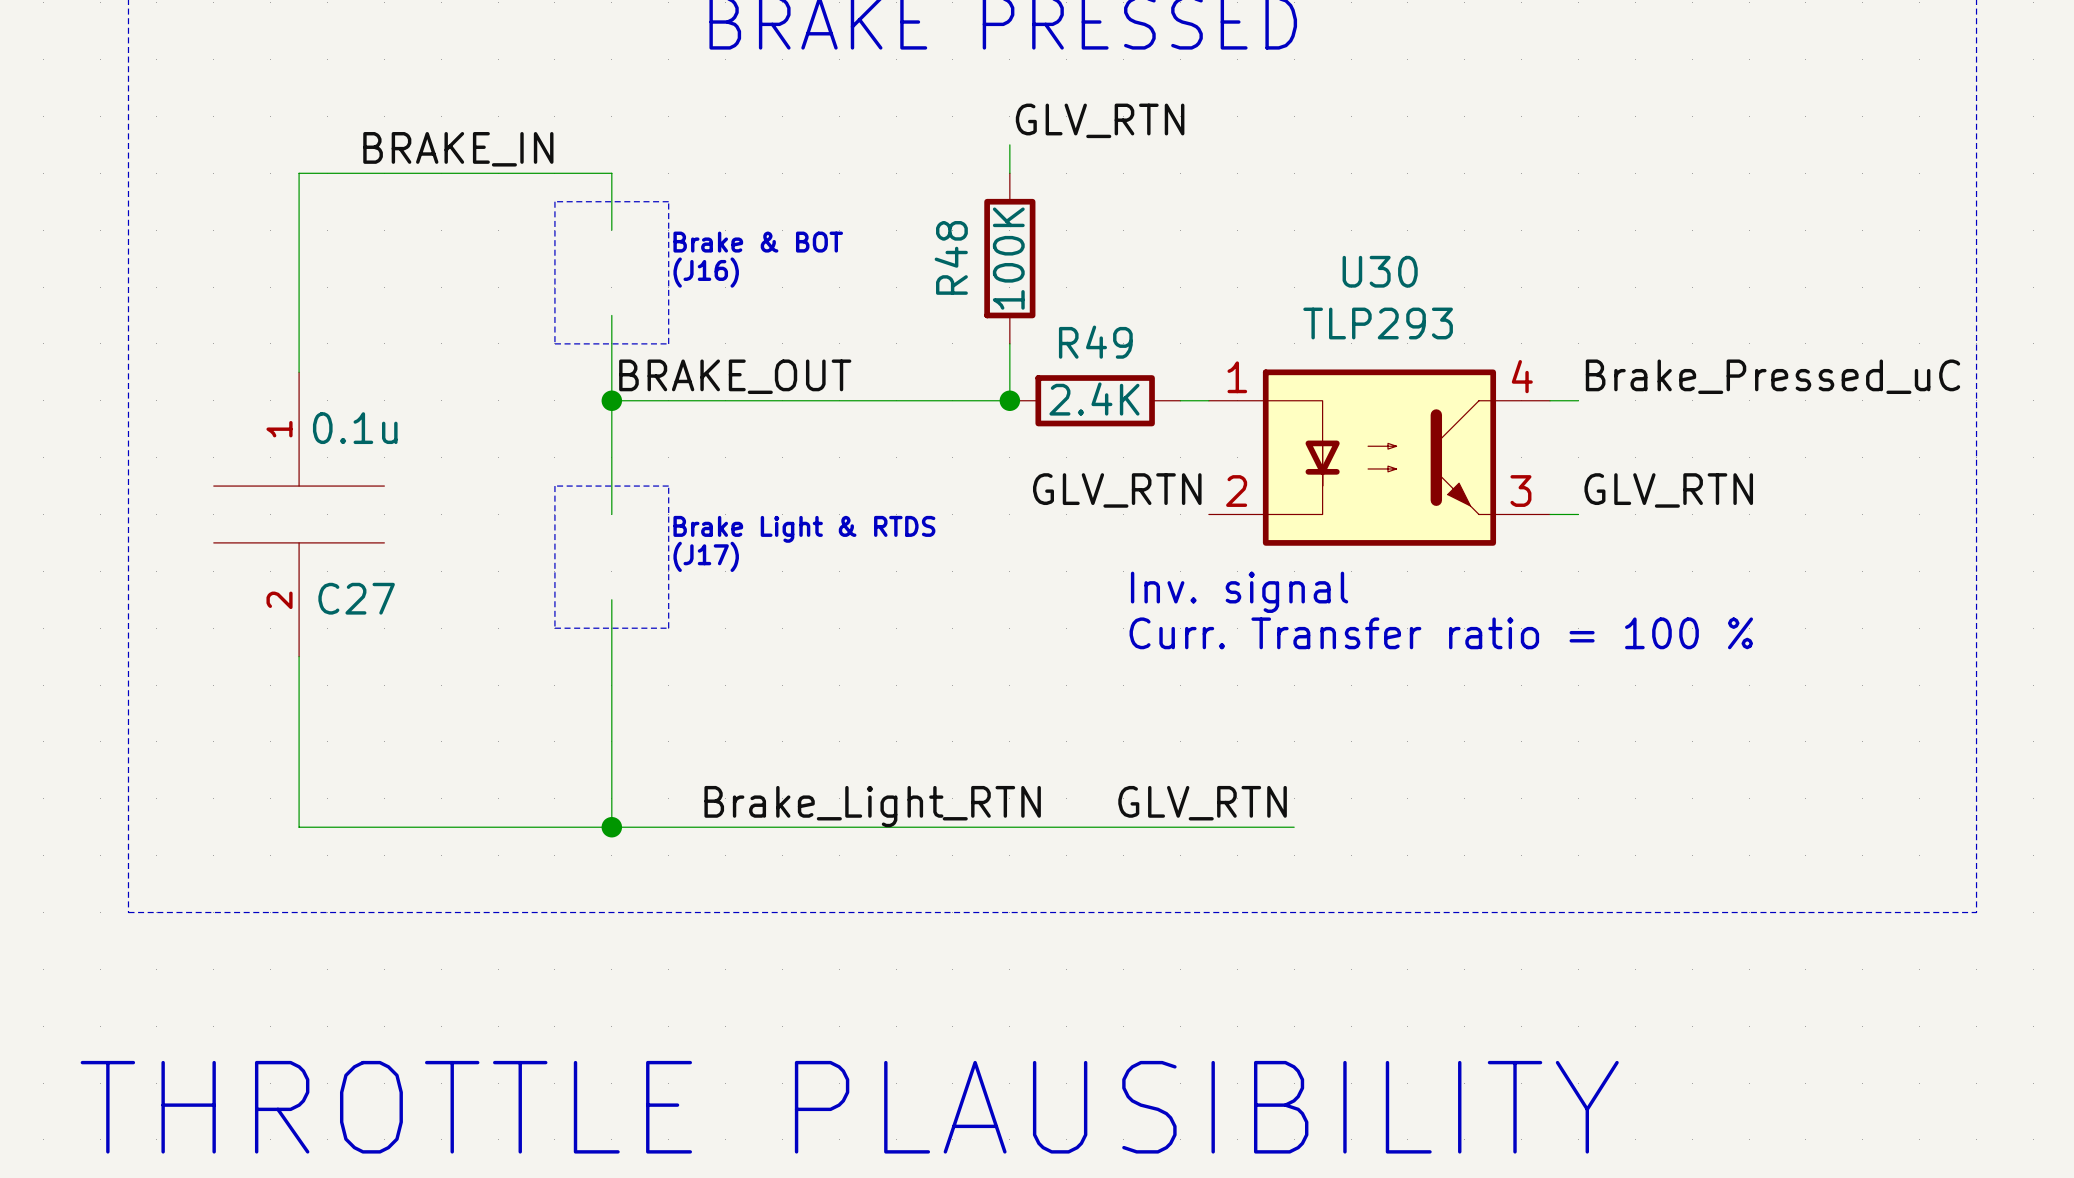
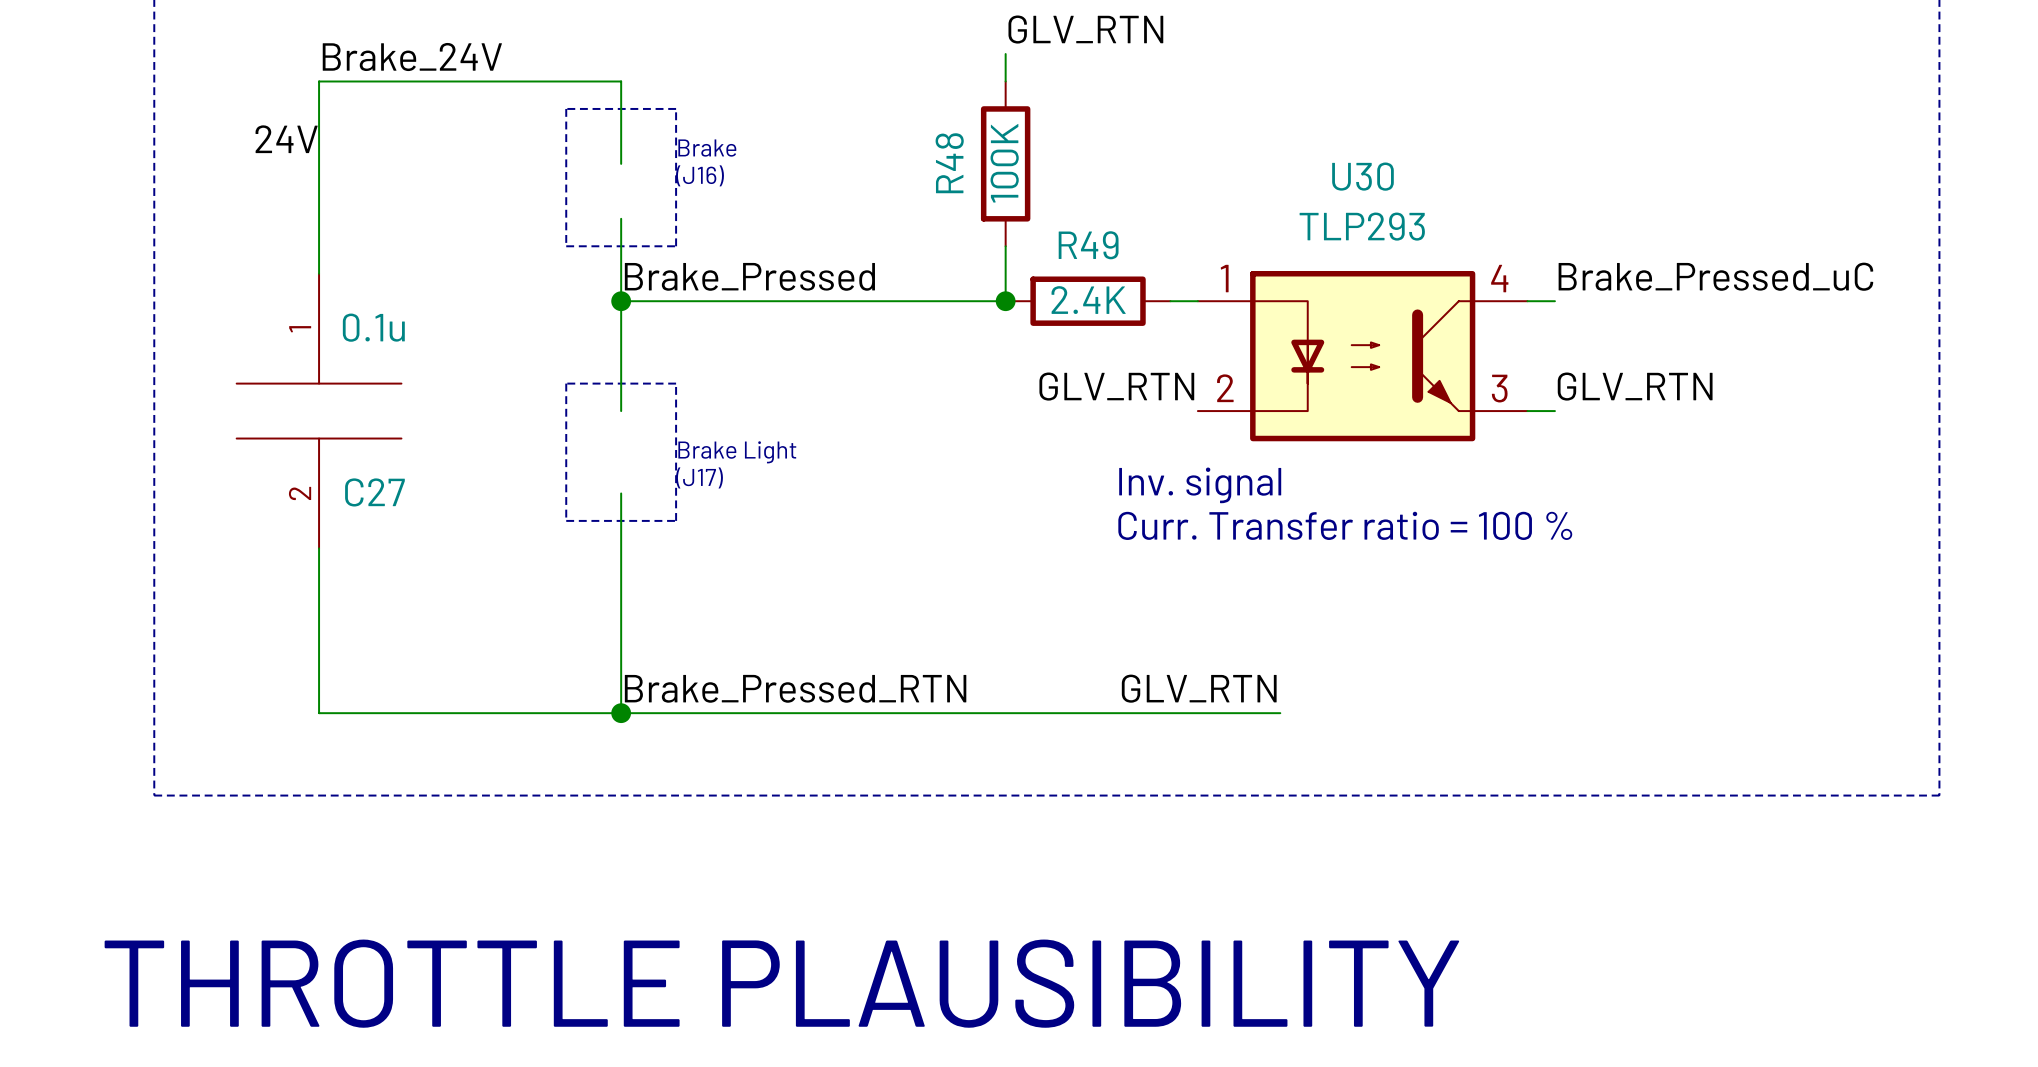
label: none -> Brake_24V (412, 57)
label: BRAKE_IN (458, 149) -> none
wire: none -> (621, 136) (621, 163)
label: none -> 24V (286, 139)
text: Brake & BOT (758, 242) -> Brake (707, 148)
label: BRAKE_OUT (735, 376) -> Brake_Pressed (749, 276)
text: Brake Light & RTDS (804, 529) -> none
text: (J17) (706, 556) -> Brake Light (737, 452)
text: none -> (J17) (699, 477)
label: Brake_Light_RTN (872, 806) -> Brake_Pressed_RTN (795, 688)

